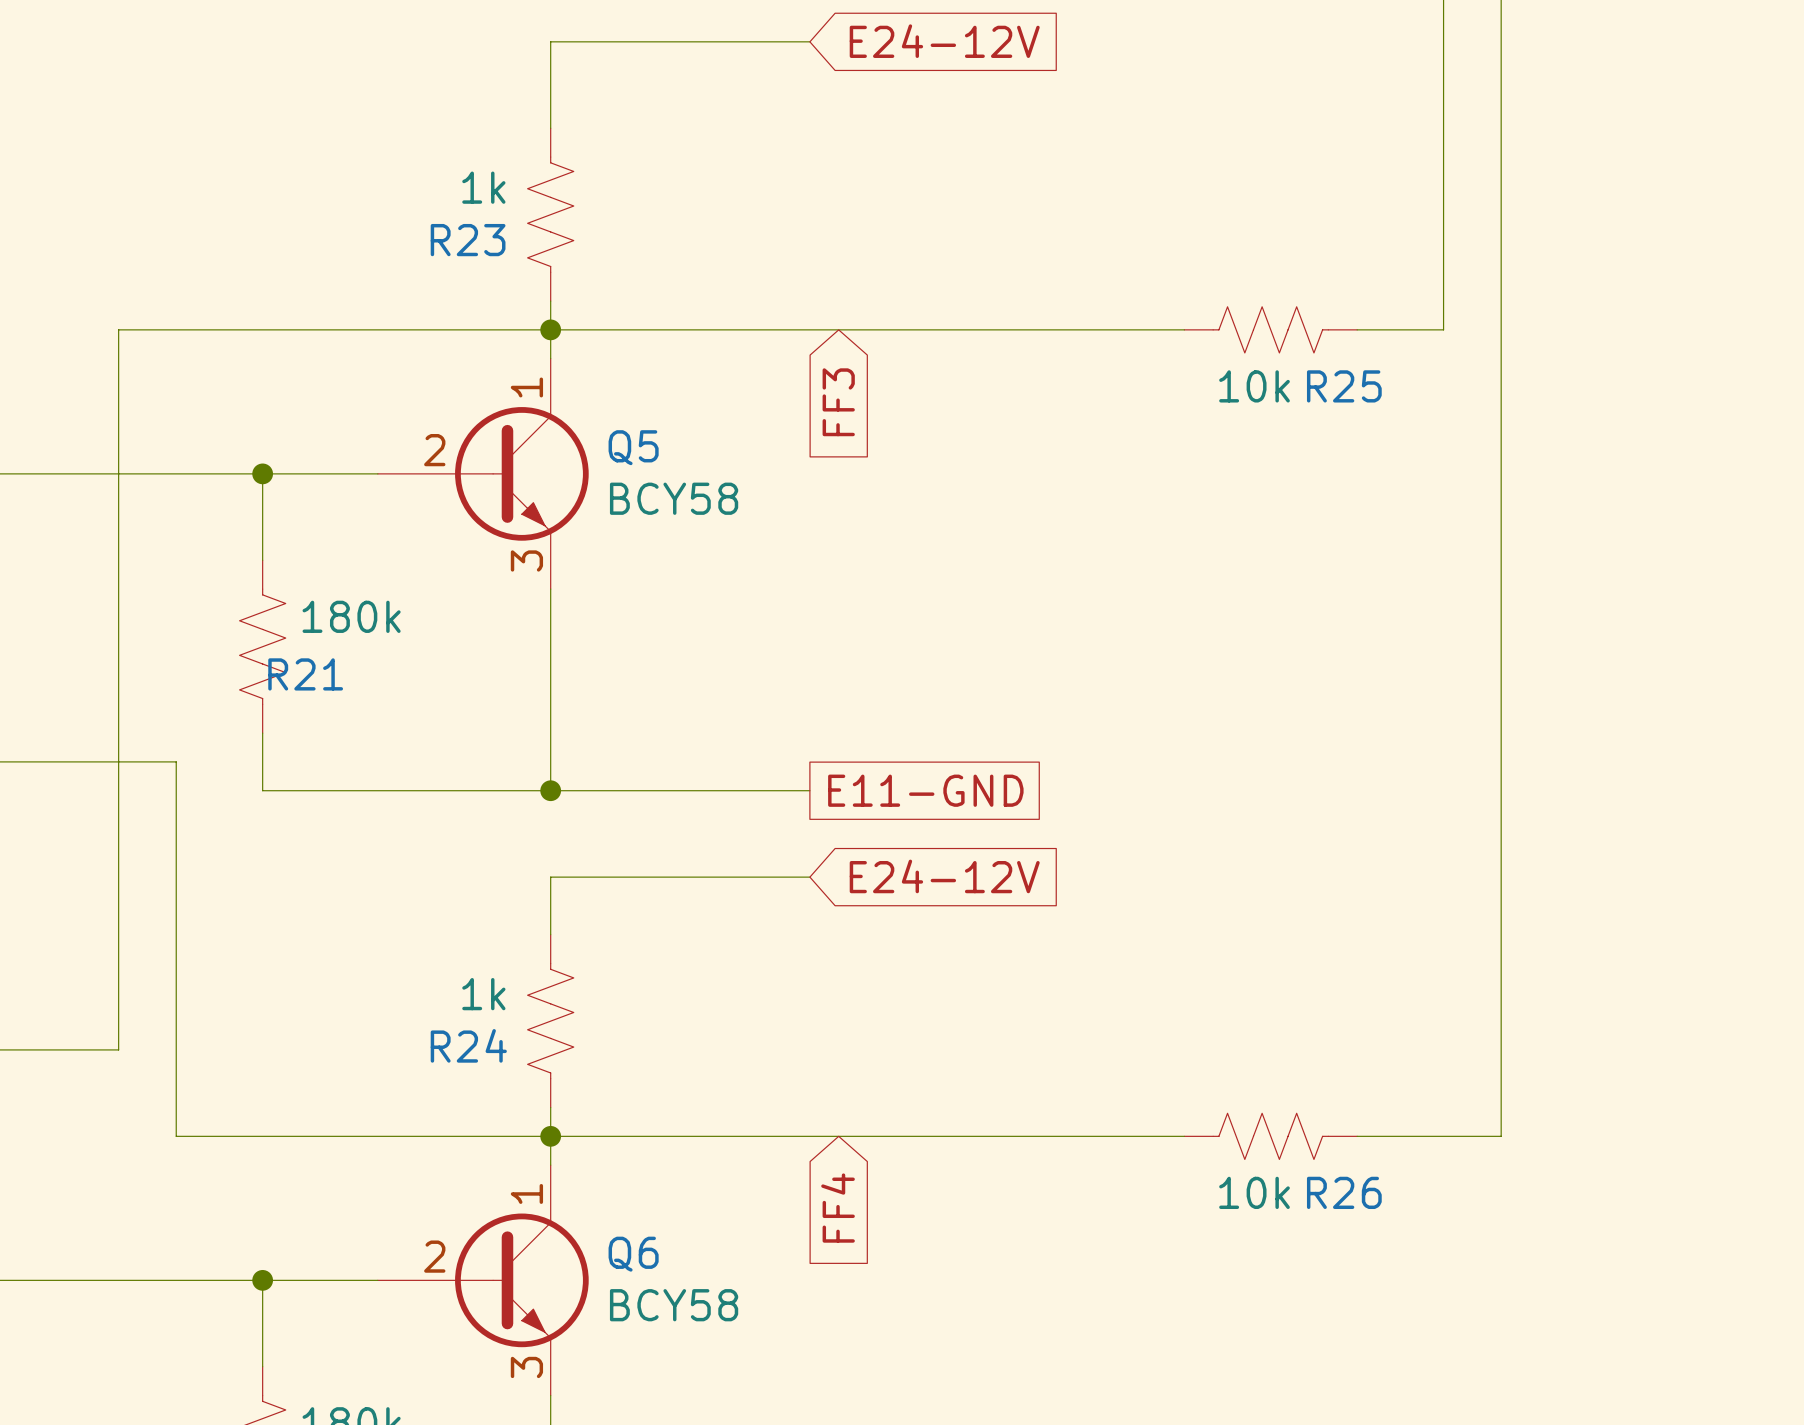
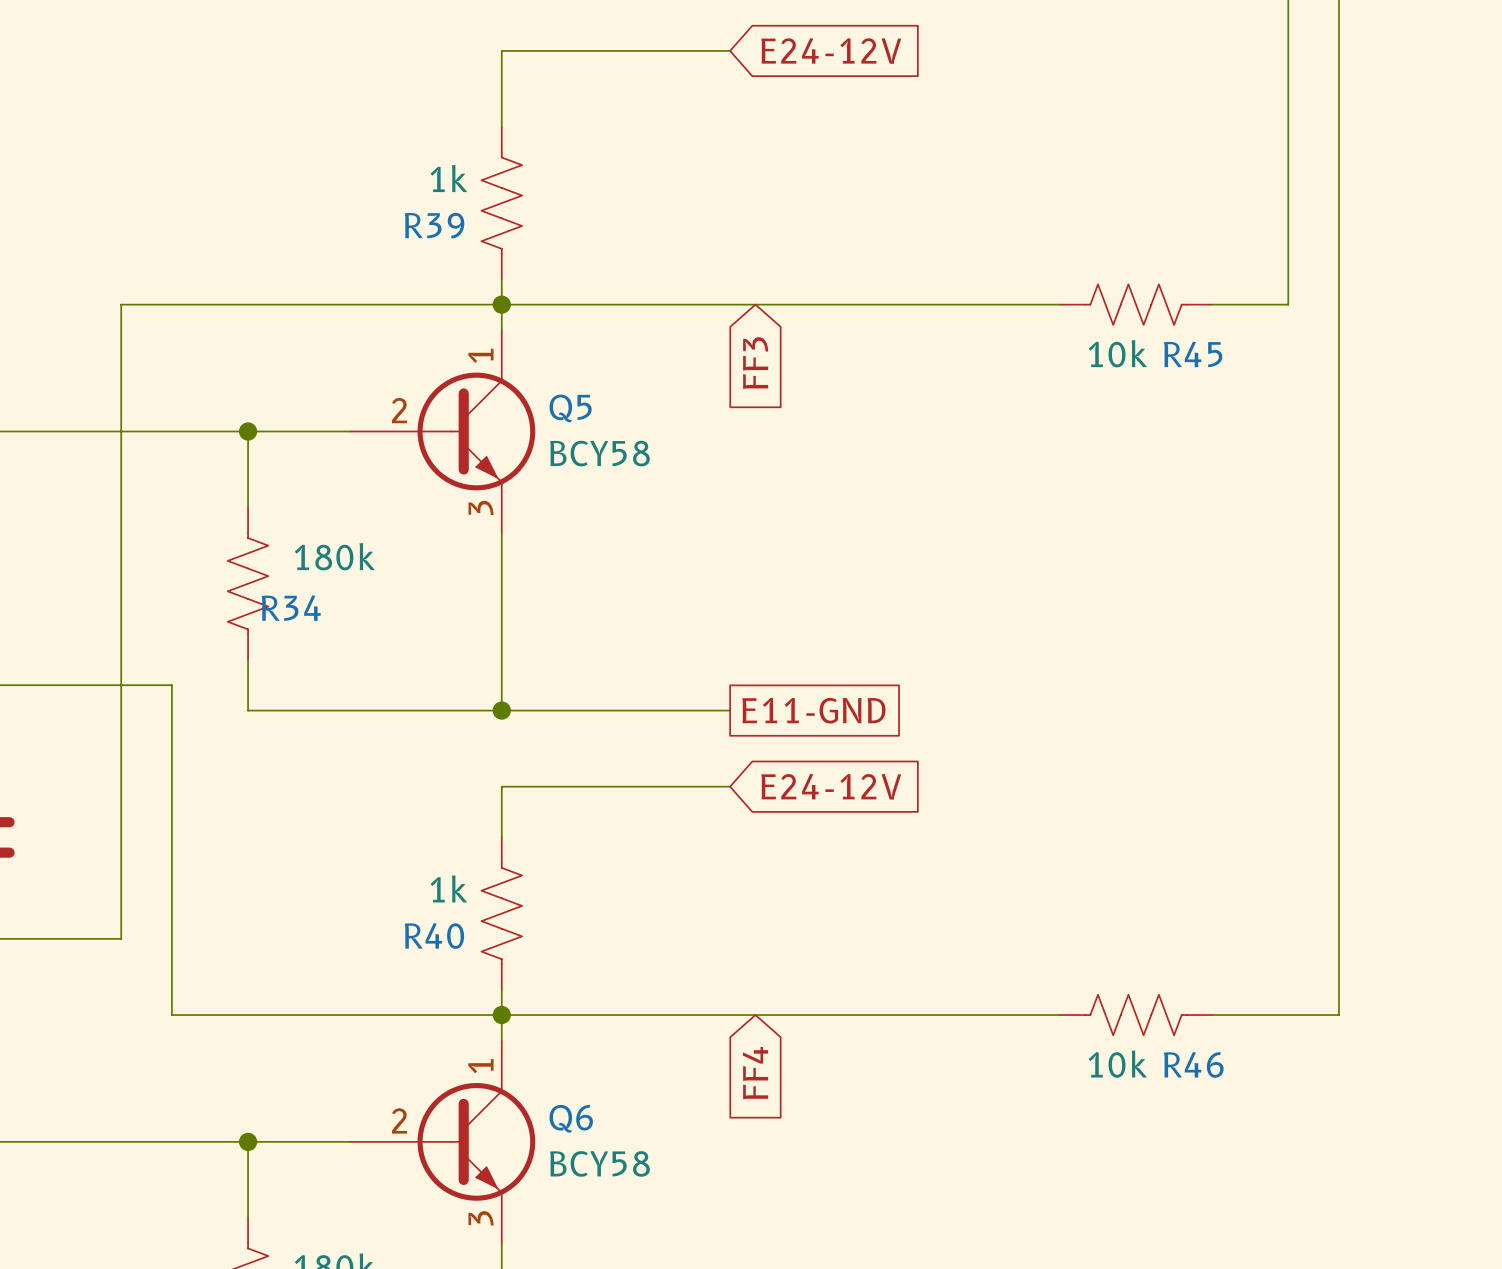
R23 name: R23 (468, 240) -> R39 (434, 225)
R25 name: R25 (1344, 386) -> R45 (1193, 354)
R21 name: R21 (305, 674) -> R34 (291, 608)
R24 name: R24 (468, 1045) -> R40 (434, 936)
R26 name: R26 (1344, 1192) -> R46 (1193, 1064)

